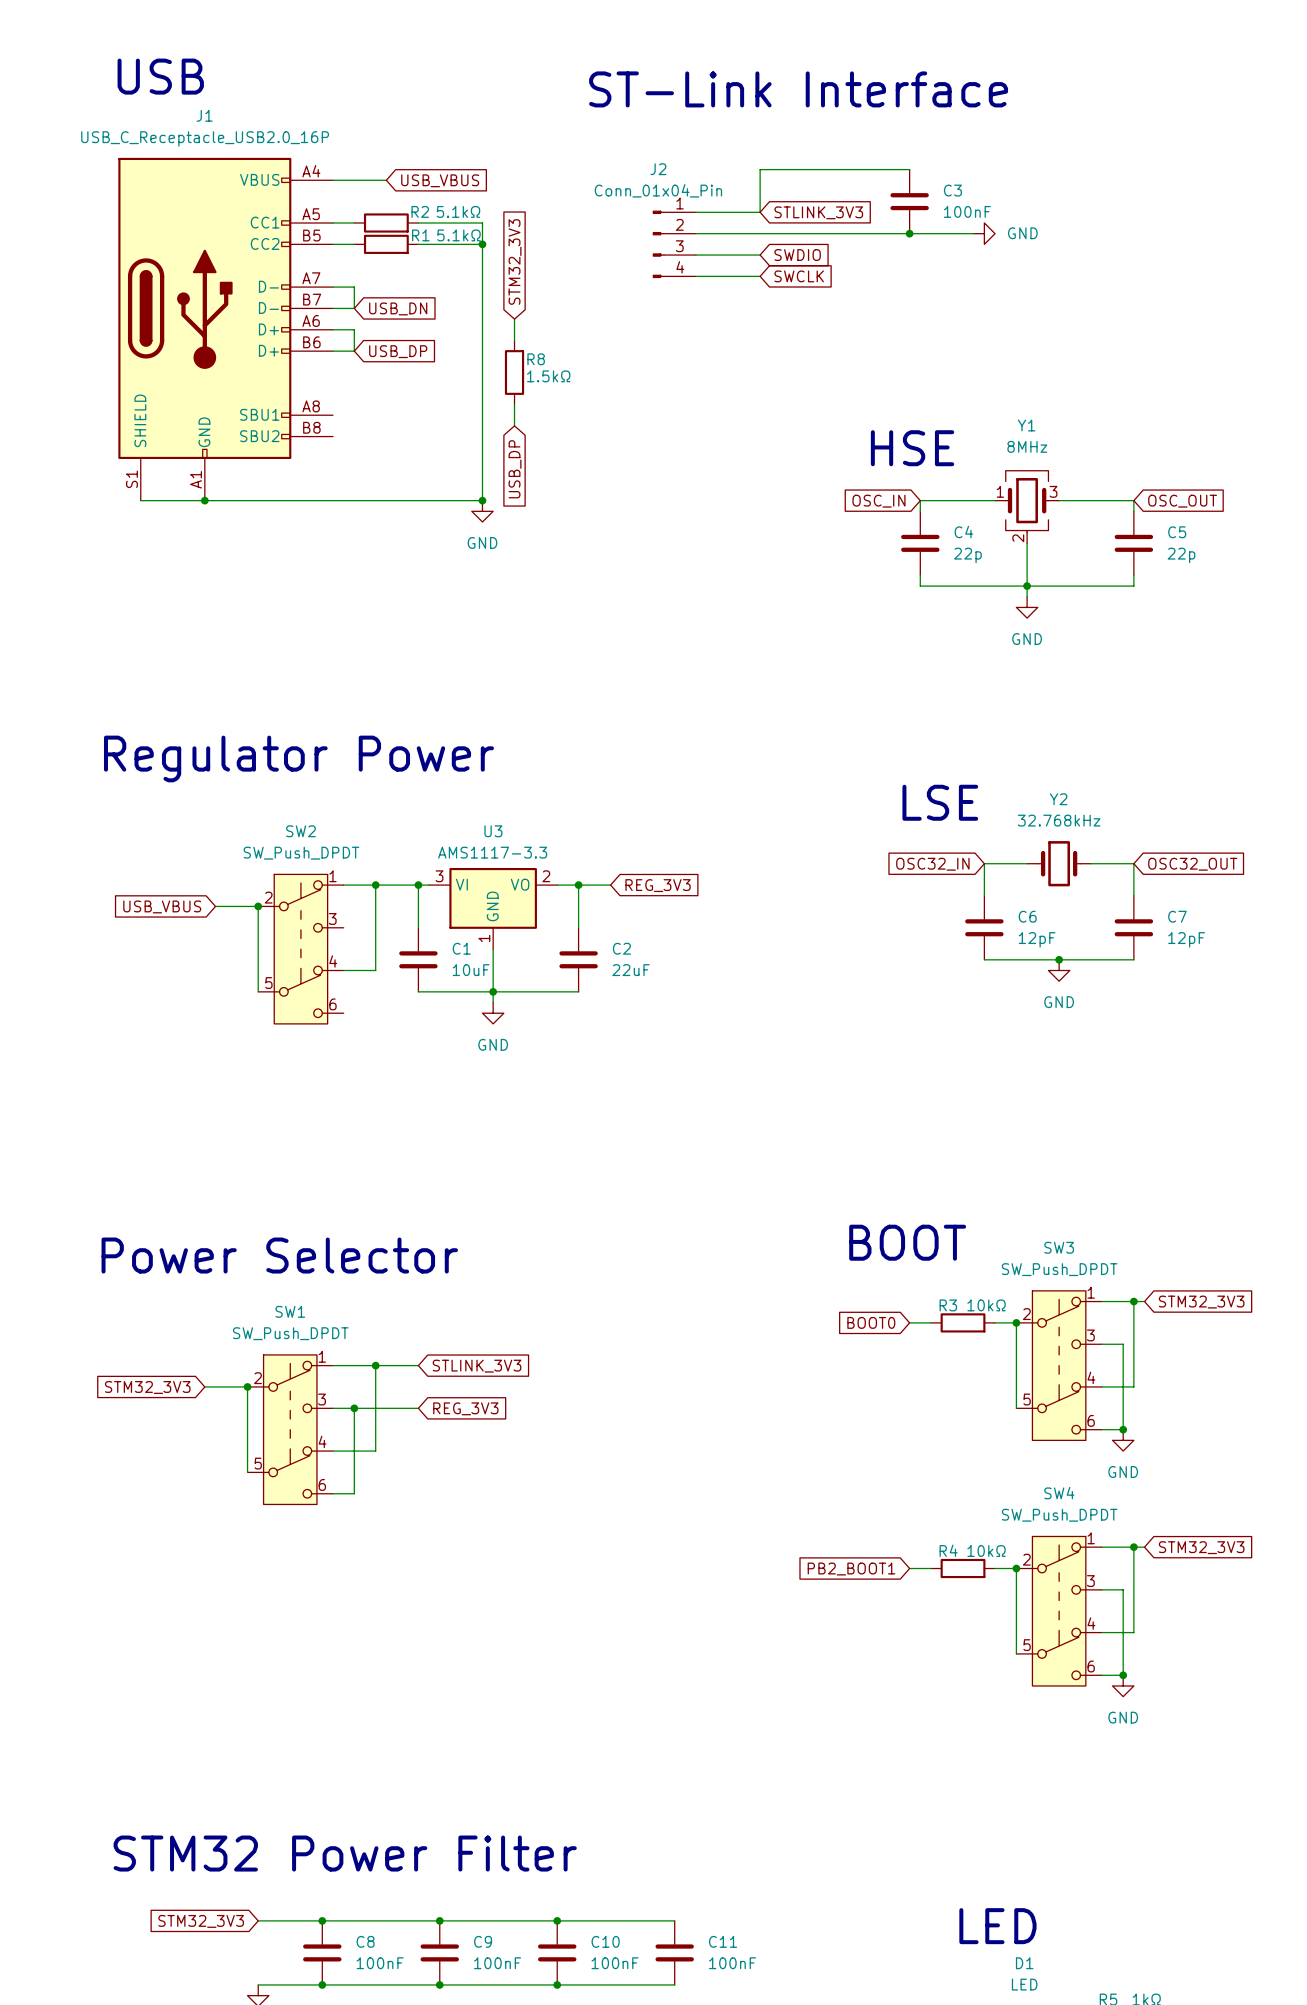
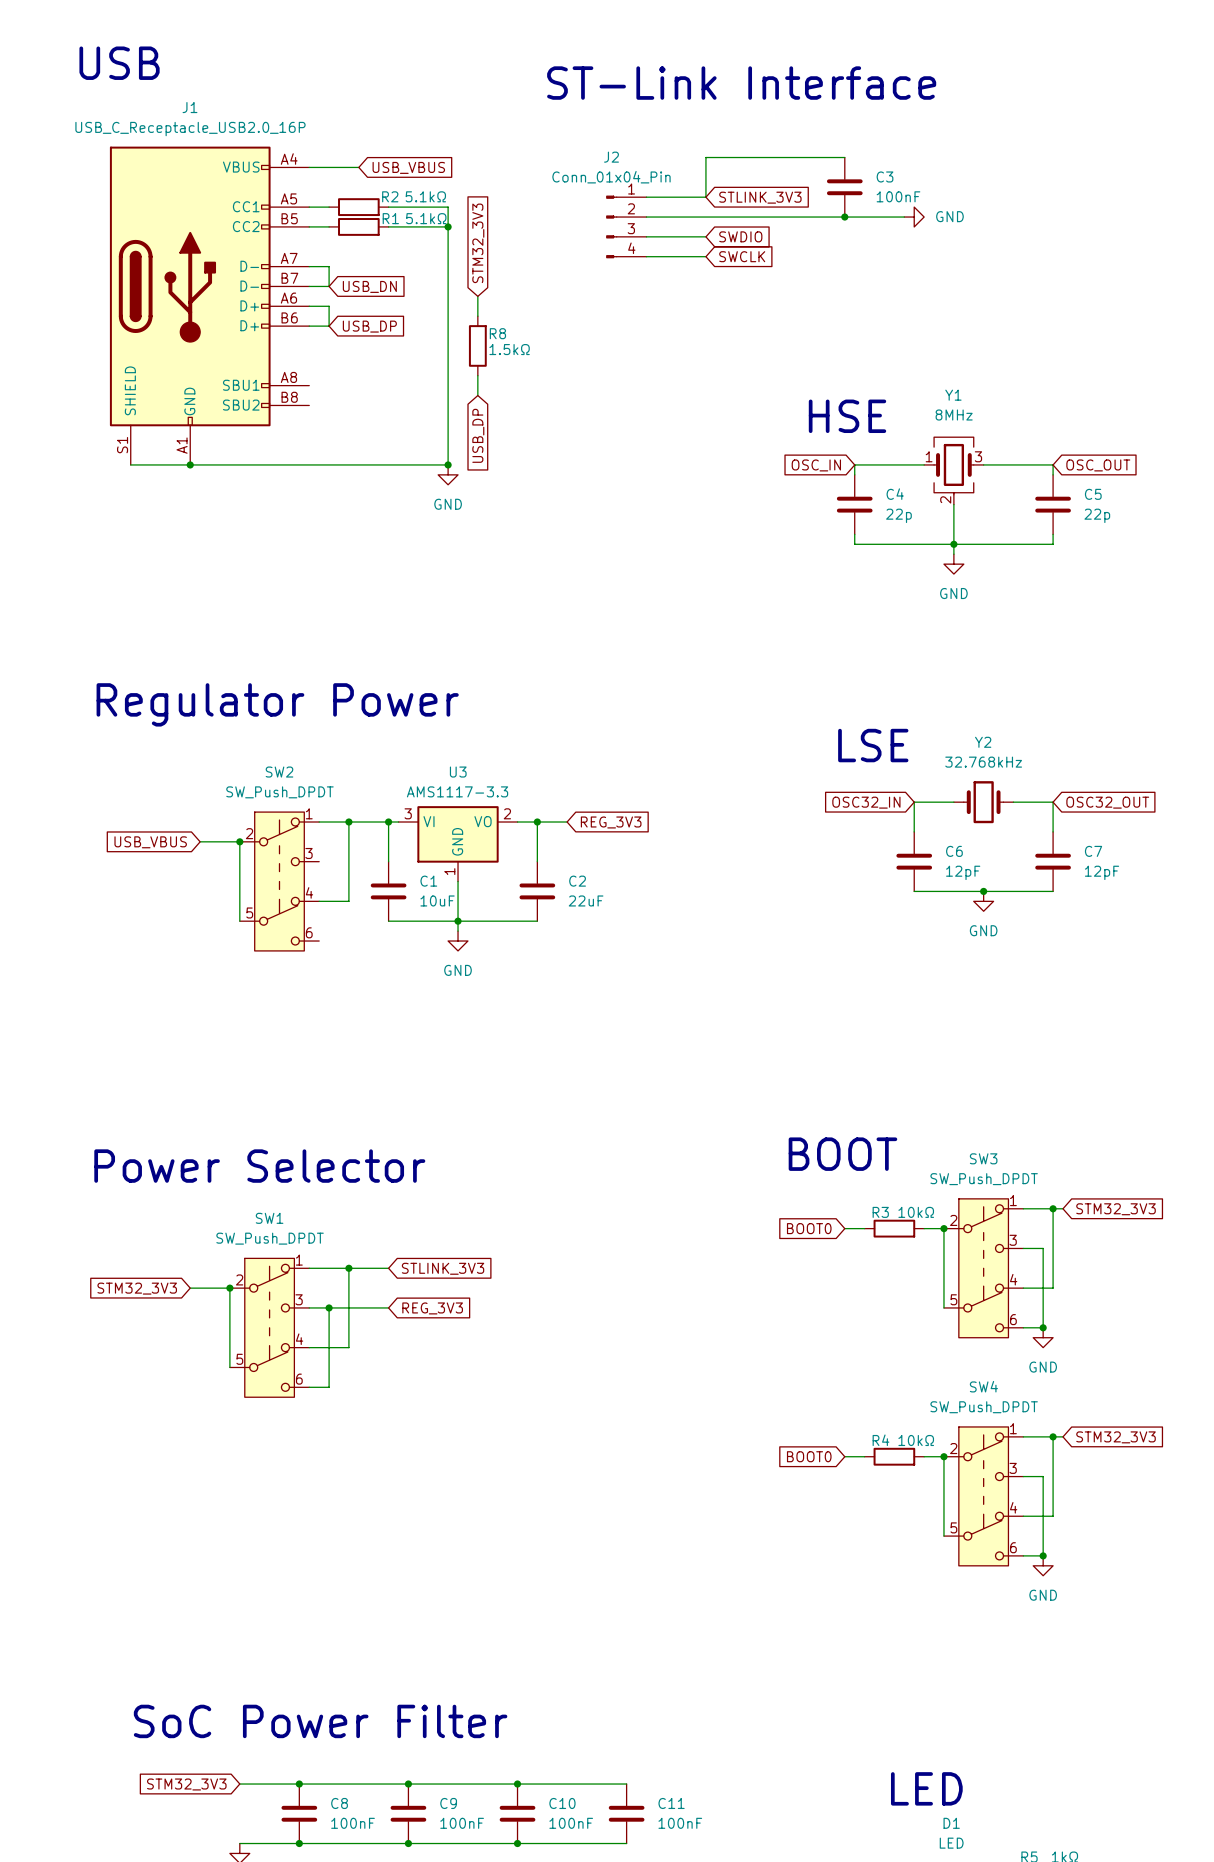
text position: USB (160, 76) -> USB (119, 63)
global label: PB2_BOOT1 (851, 1569) -> BOOT0 (809, 1456)
text: STM32 Power Filter (345, 1853) -> SoC Power Filter (320, 1721)

